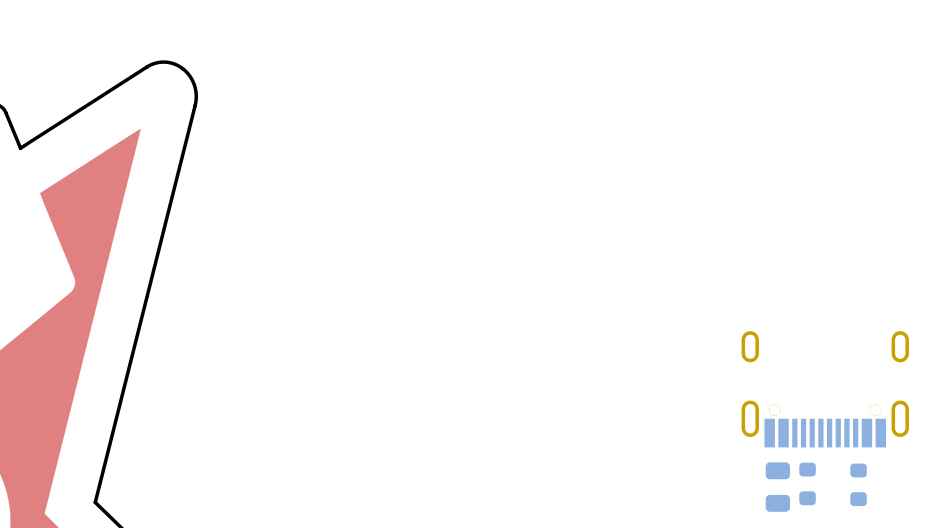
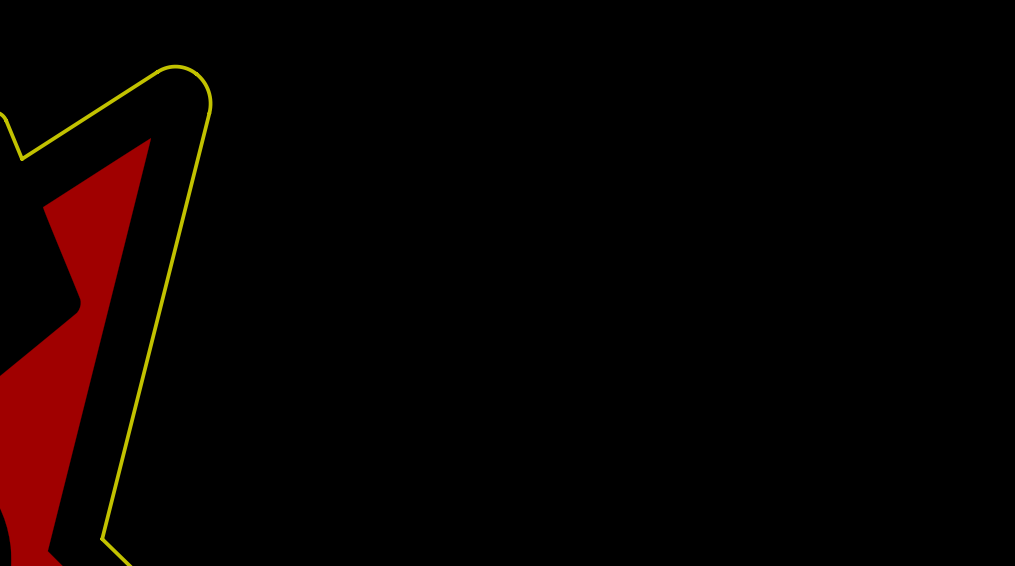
part: (825, 389) -> none
part: (807, 483) -> none
part: (858, 484) -> none
part: (777, 487) -> none

